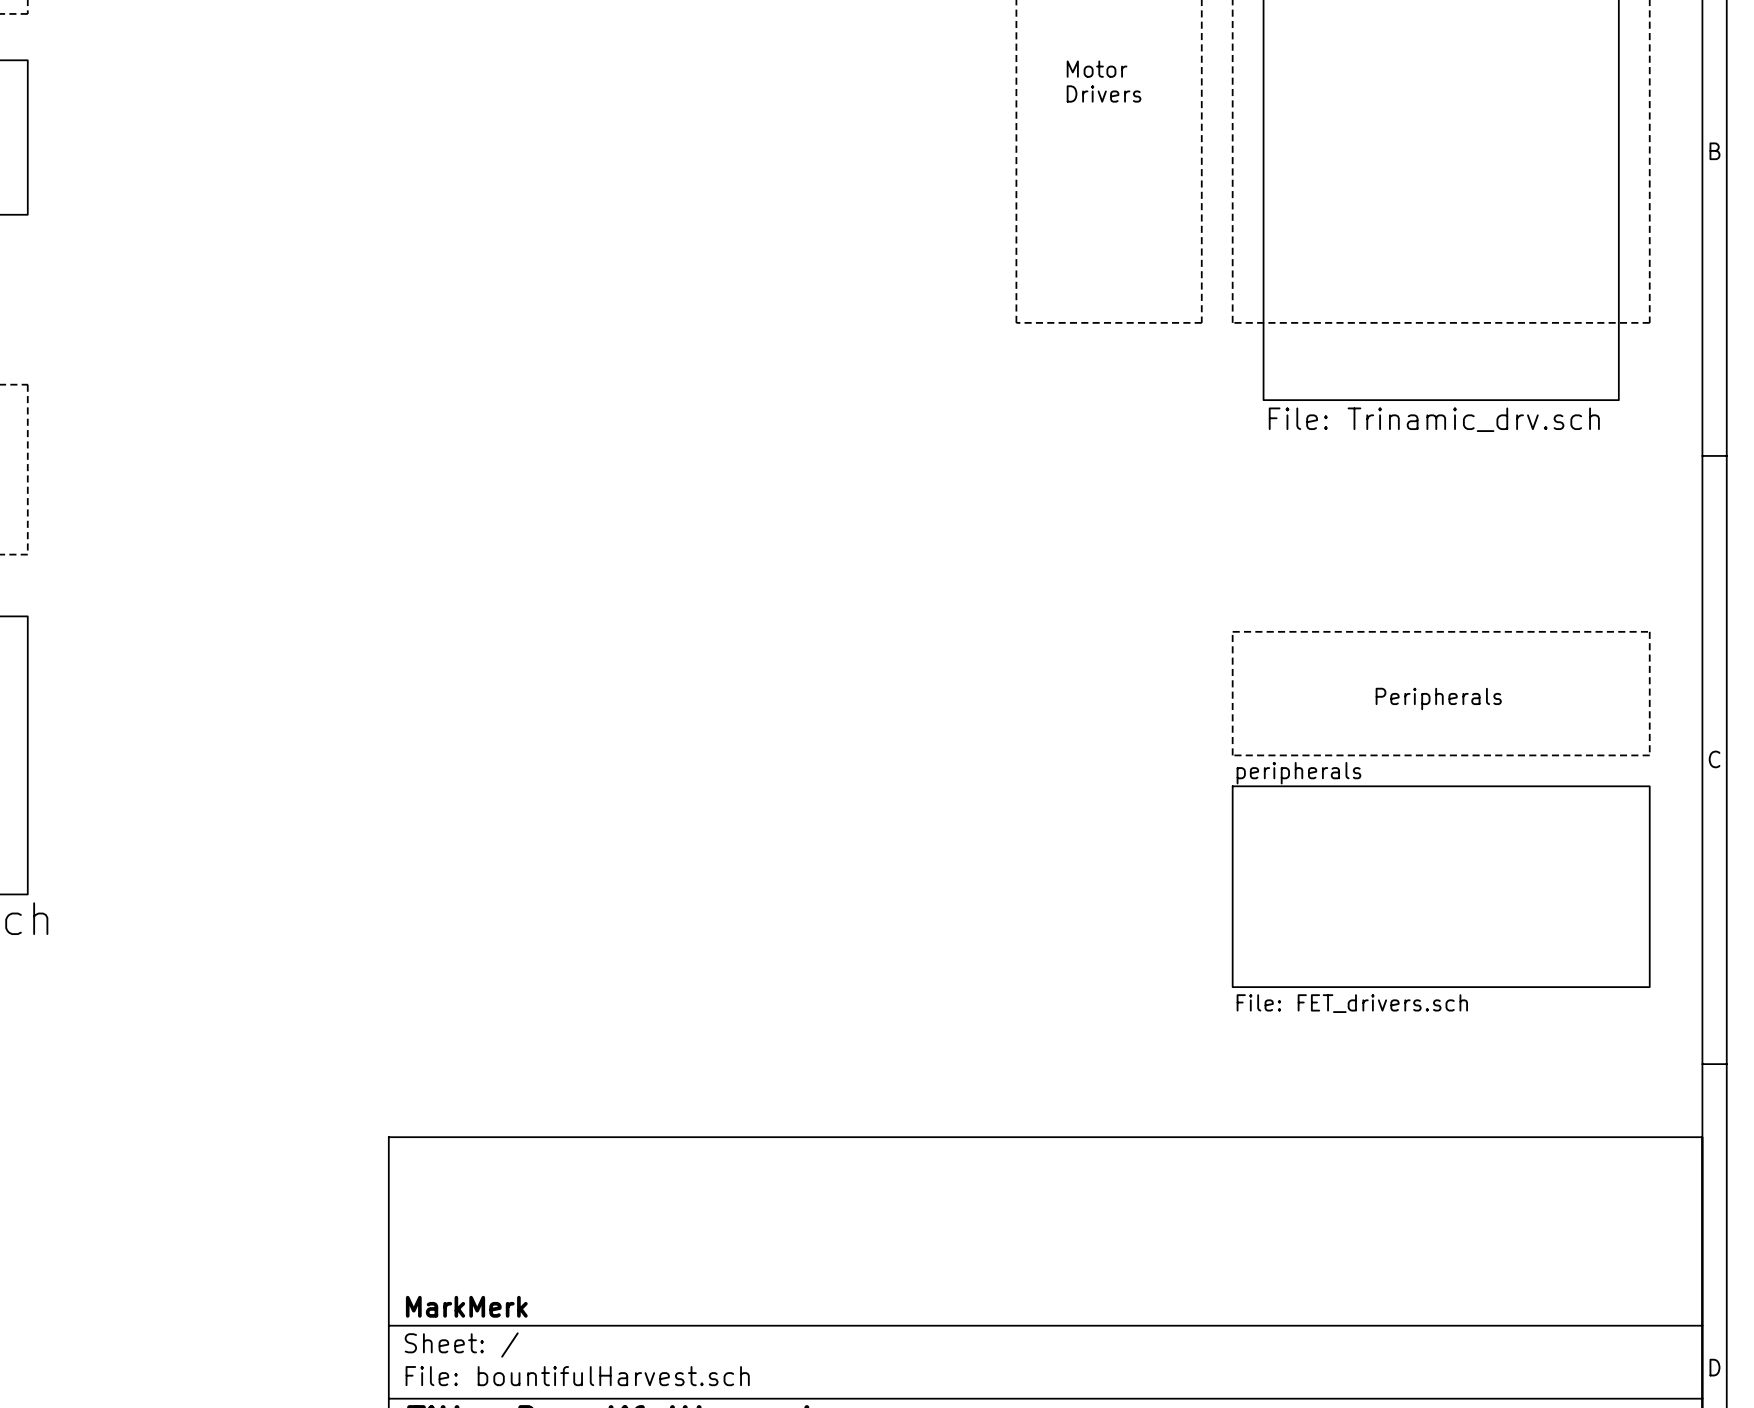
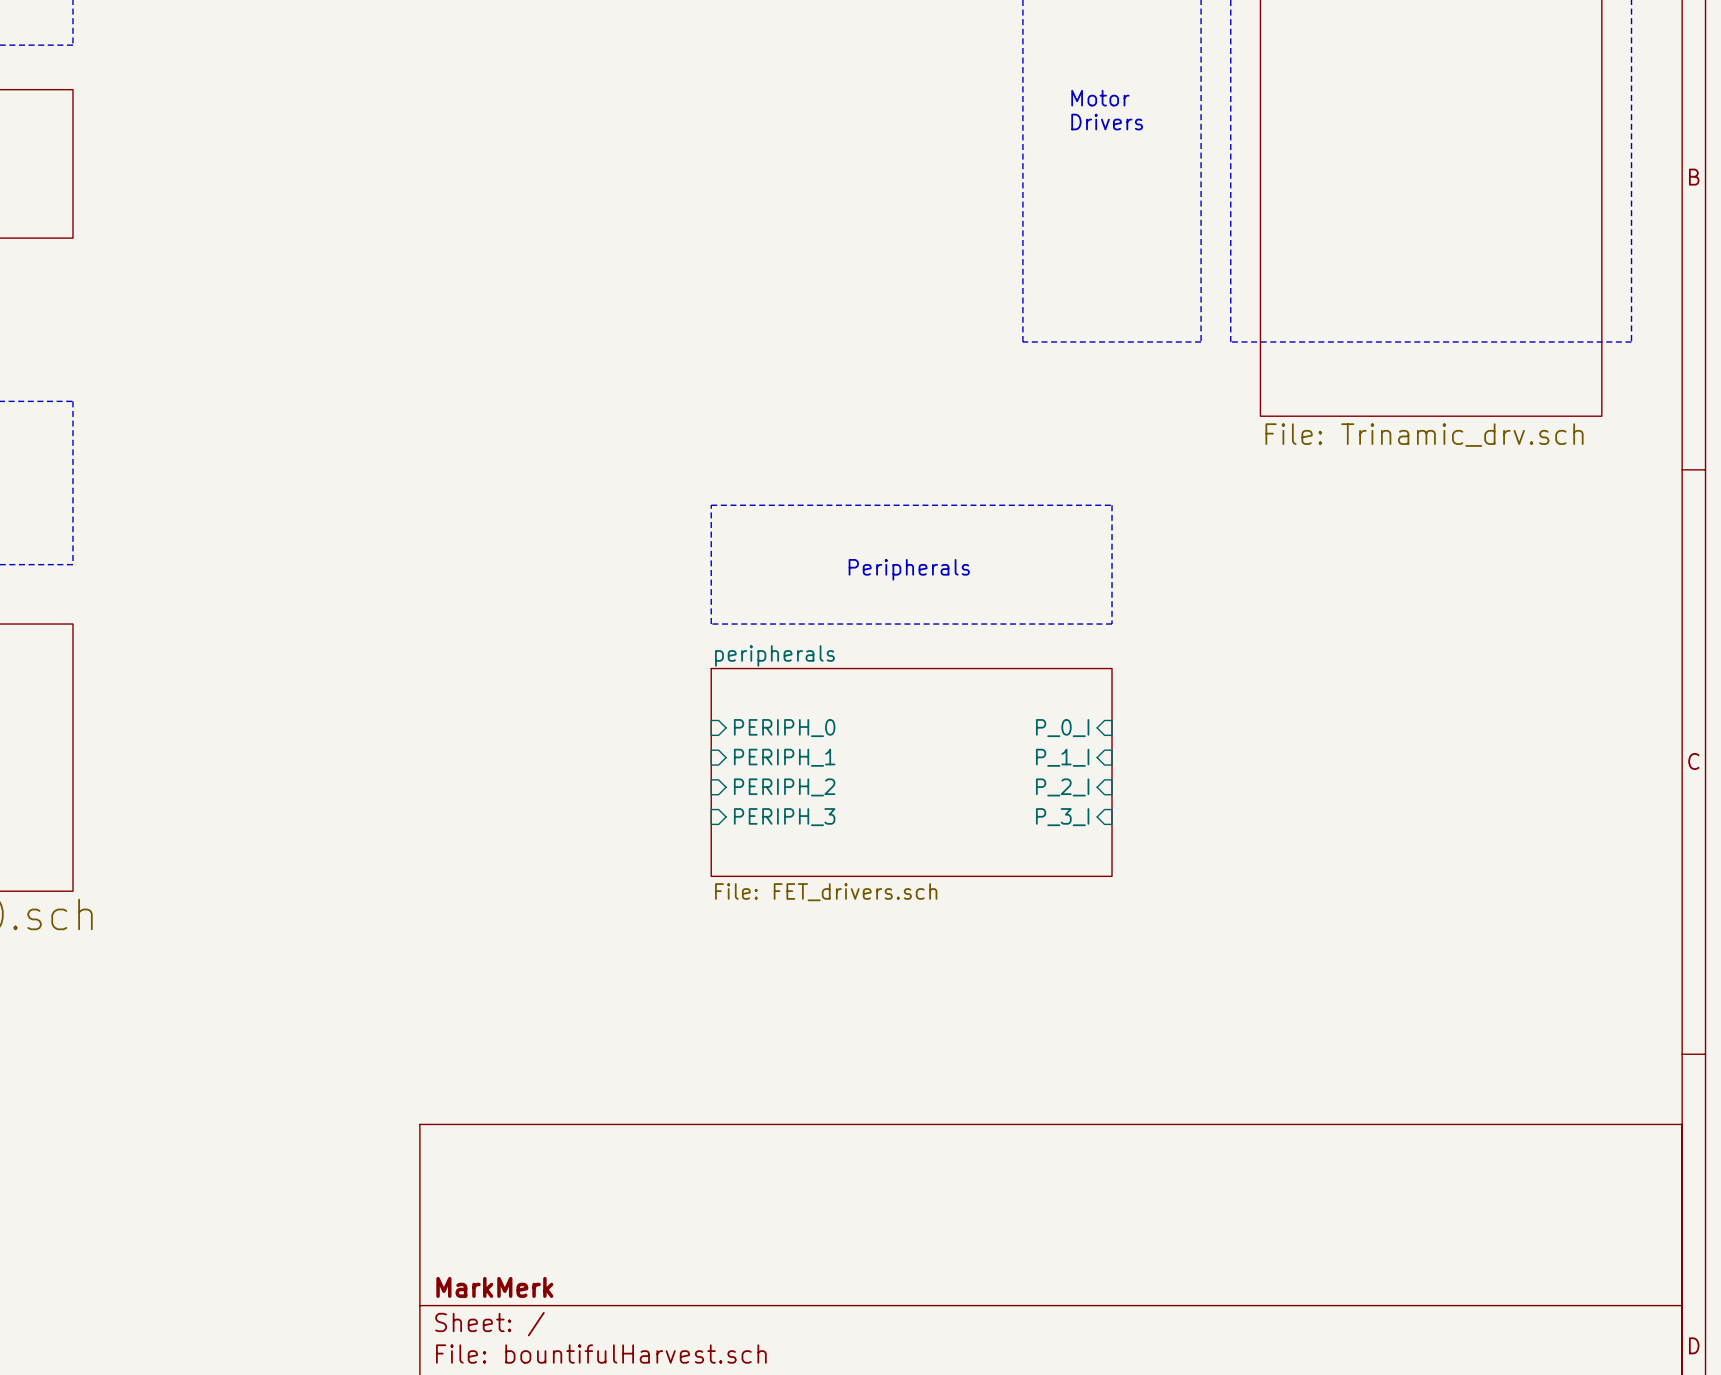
line: none -> (711, 505) (1112, 505) (1112, 624) (711, 624) (711, 505)
text: none -> Peripherals (909, 569)
line: (1232, 631) (1649, 631) (1649, 755) (1232, 755) (1232, 631) -> none
text: Peripherals (1438, 698) -> none
sheet pin: none -> PERIPH_0 (784, 728)
sheet pin: none -> P_0_I (1062, 728)
sheet pin: none -> PERIPH_1 (784, 757)
sheet pin: none -> P_1_I (1062, 757)
sheet peripherals: none -> File: FET_drivers.sch (911, 772)
sheet pin: none -> PERIPH_2 (784, 787)
sheet pin: none -> P_2_I (1062, 787)
sheet pin: none -> PERIPH_3 (784, 817)
sheet pin: none -> P_3_I (1062, 817)
sheet peripherals: File: FET_drivers.sch (1441, 886) -> none

